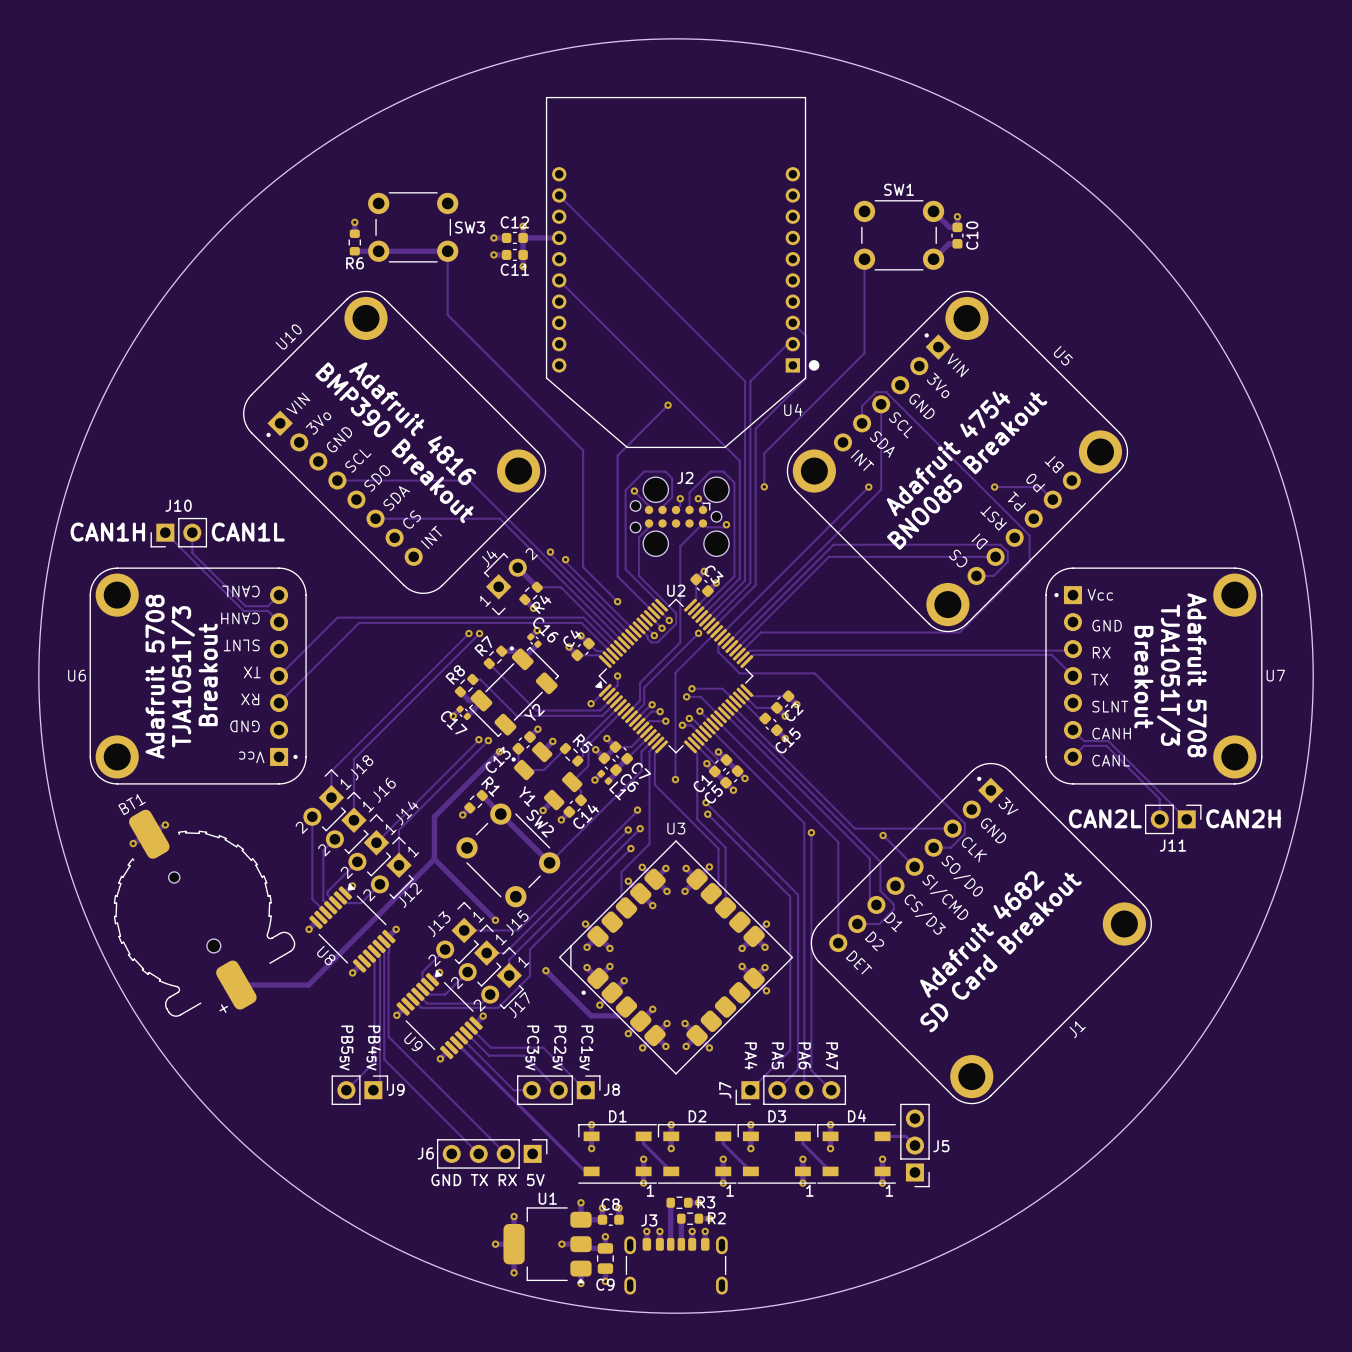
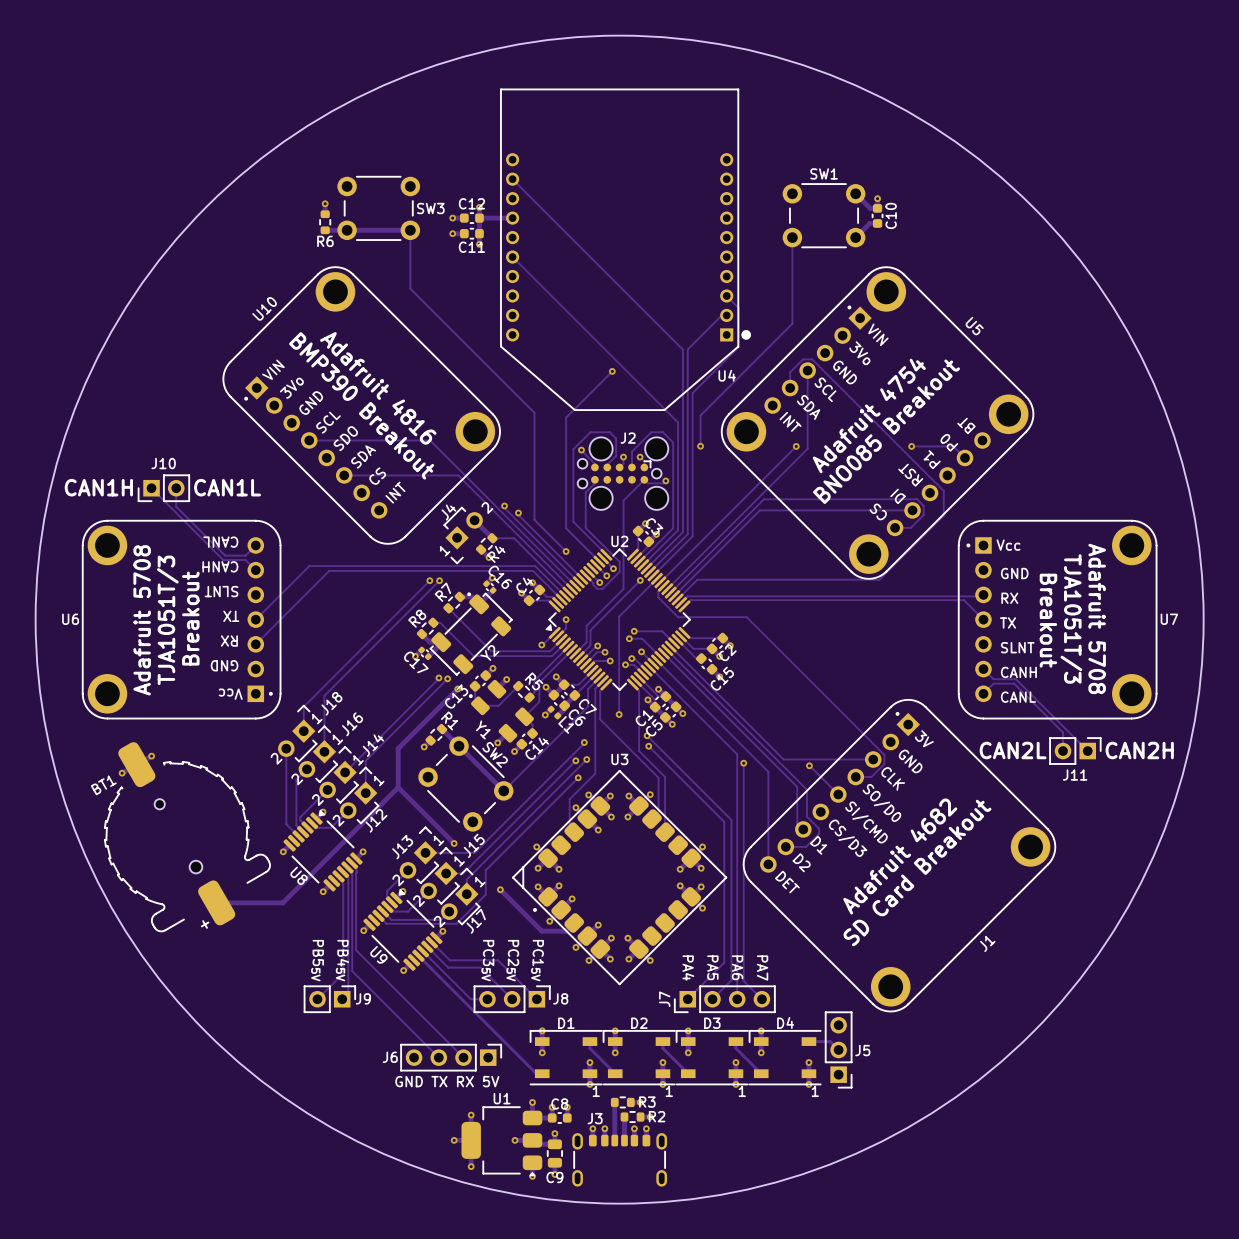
BT1 name position: BT1 (132, 804) -> BT1 (103, 785)

